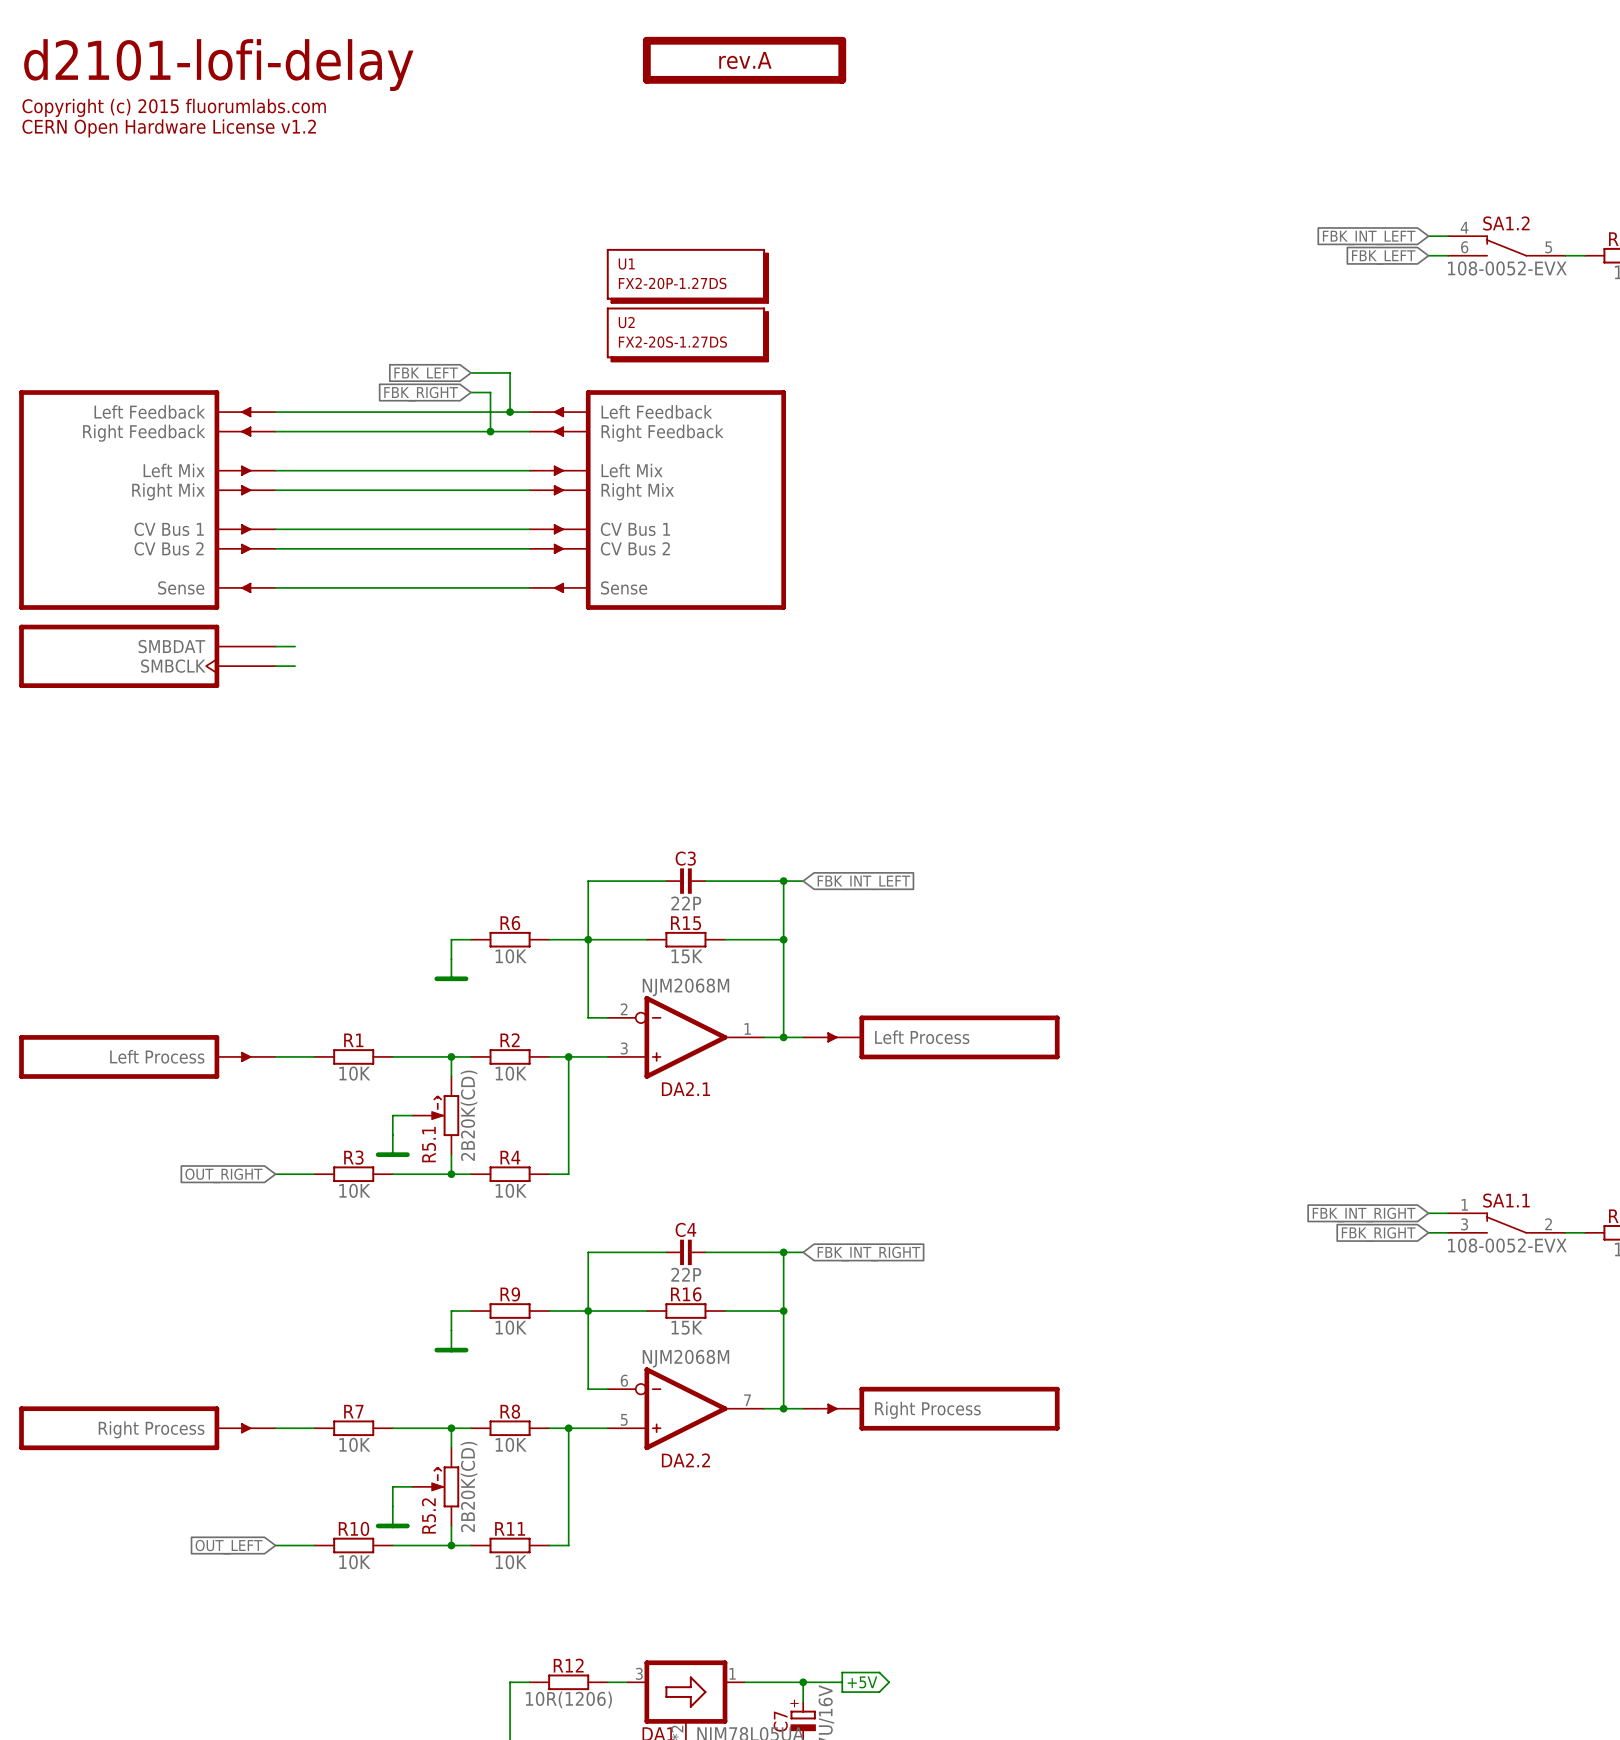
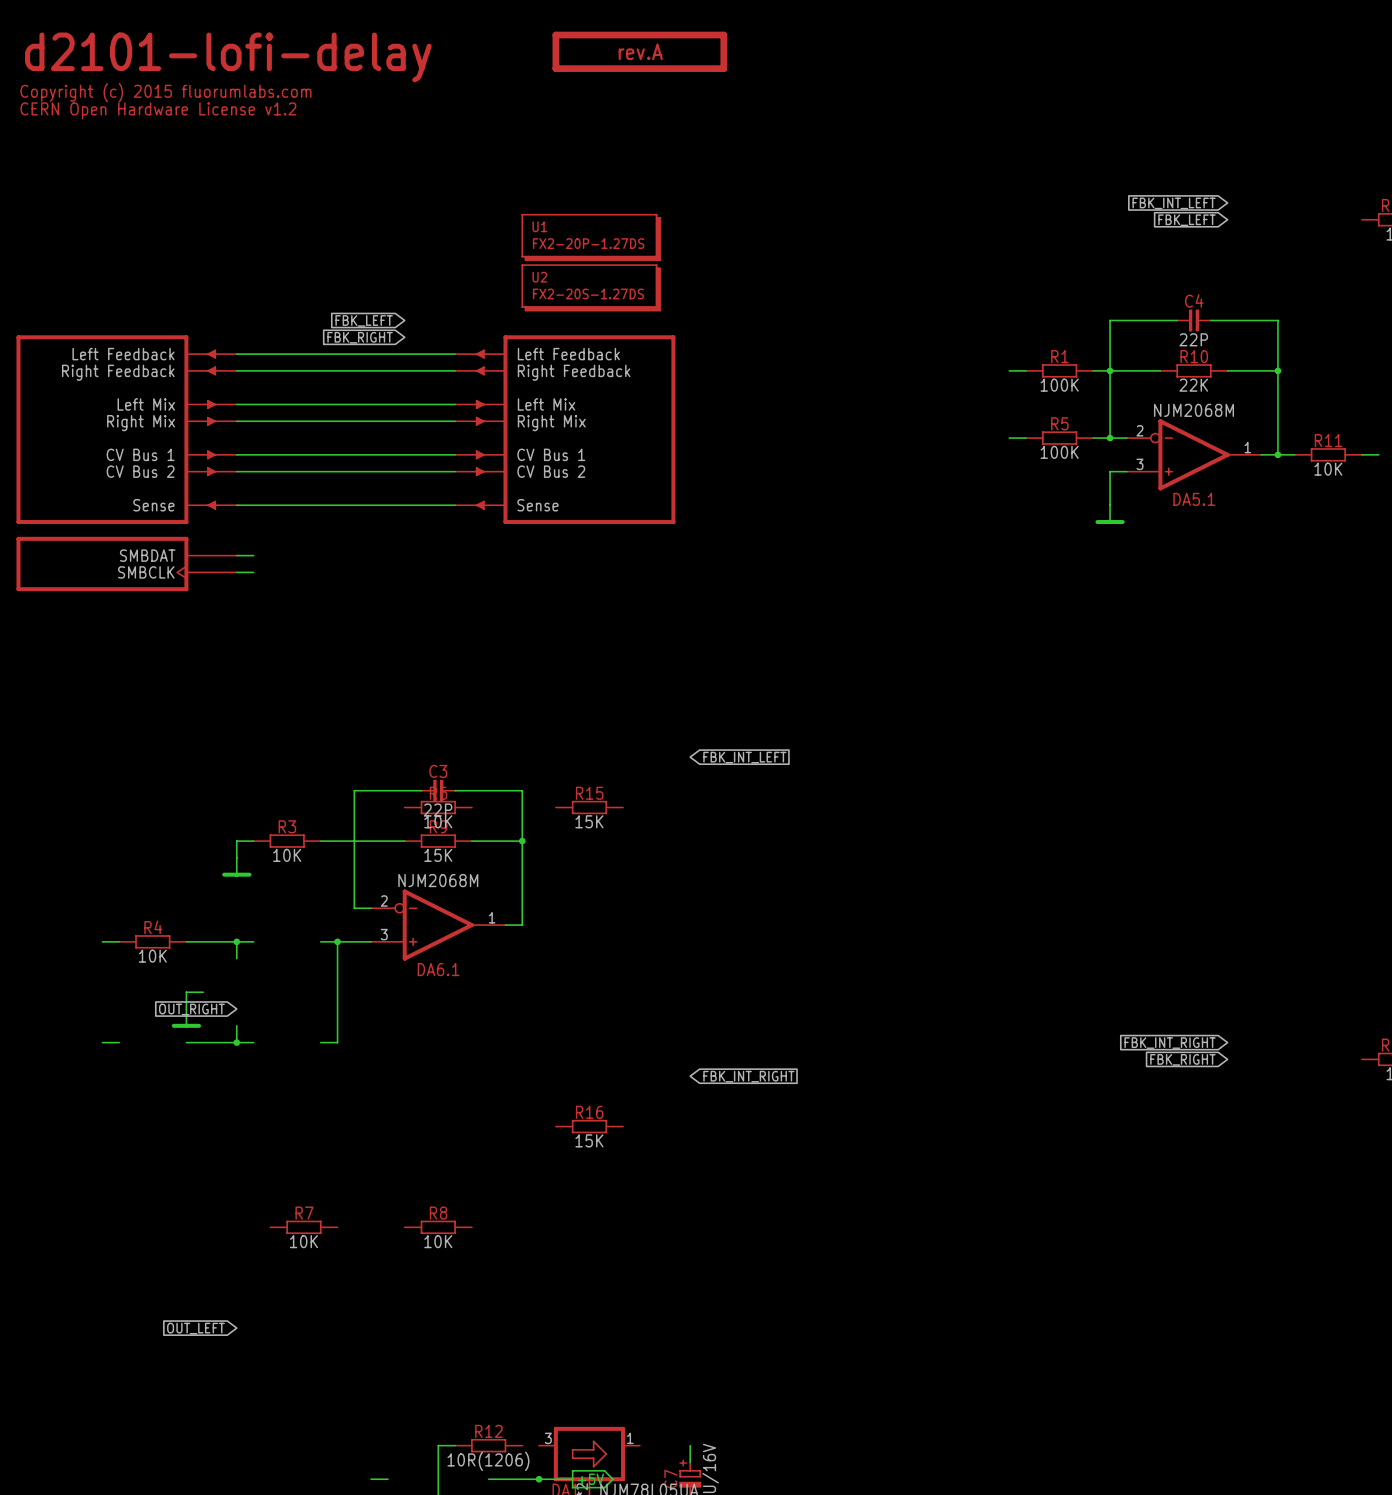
wire: (1428, 236) (1448, 236) -> none
SA1.2: 108-0052-EVX (1506, 245) -> none
wire: (1428, 255) (1448, 255) -> none
wire: (1565, 255) (1584, 255) -> none
wire: (470, 372) (510, 372) (510, 412) -> none
wire: none -> (1177, 320) (1110, 320) (1110, 438)
wire: none -> (1210, 320) (1277, 320) (1277, 454)
wire: (470, 392) (490, 392) (490, 431) -> none
junction: (510, 412) -> none
junction: (490, 431) -> none
wire: none -> (1009, 370) (1026, 370)
wire: none -> (1093, 370) (1160, 370)
junction: none -> (1110, 370)
wire: none -> (1227, 370) (1277, 370)
junction: none -> (1277, 370)
wire: none -> (1009, 438) (1026, 438)
R5: none -> 100K (1059, 438)
wire: none -> (1093, 438) (1126, 438)
junction: none -> (1110, 438)
DA5.1: none -> NJM2068M (1193, 454)
wire: none -> (1261, 454) (1294, 454)
junction: none -> (1277, 454)
wire: none -> (1361, 454) (1378, 454)
wire: none -> (1126, 471) (1110, 471) (1110, 505)
power symbol: none -> (1110, 514)
wire: (666, 881) (588, 881) (588, 1017) (607, 1017) -> none
C3 position: (685, 881) -> (438, 790)
wire: (705, 881) (803, 881) -> none
wire: (783, 881) (783, 1037) -> none
junction: (783, 881) -> none
wire: none -> (455, 790) (522, 790) (522, 925) (505, 925)
wire: (470, 939) (451, 939) (451, 959) -> (253, 841) (236, 841) (236, 857)
wire: (549, 939) (646, 939) -> (320, 841) (404, 841)
junction: (588, 939) -> none
wire: (725, 939) (783, 939) -> (471, 841) (522, 841)
junction: (783, 939) -> none
power symbol: (451, 969) -> none
junction: none -> (522, 841)
power symbol: none -> (236, 867)
DA2.1: NJM2068M (685, 1037) -> none
wire: (764, 1037) (803, 1037) -> none
junction: (783, 1037) -> none
part: (931, 1037) -> none
part: (147, 1056) -> none
wire: (275, 1056) (314, 1056) -> none
R1 position: (353, 1056) -> (1059, 370)
wire: (392, 1056) (412, 1056) -> (421, 790) (354, 790) (354, 908)
wire: (451, 1056) (451, 1076) -> (236, 941) (236, 958)
junction: (451, 1056) -> none
R2: 10K (510, 1056) -> none
wire: (549, 1056) (607, 1056) -> (320, 941) (371, 941)
wire: (568, 1056) (568, 1174) (549, 1174) -> none
junction: (568, 1056) -> none
R1 value: 10K (354, 1073) -> 100K (1059, 385)
DA6.1: none -> NJM2068M (438, 925)
wire: none -> (102, 941) (119, 941)
wire: none -> (186, 941) (253, 941)
junction: none -> (236, 941)
junction: none -> (337, 941)
wire: (392, 1115) (412, 1115) -> (337, 958) (337, 941)
R5.1: 2B20K(CD) (435, 1115) -> none
wire: none -> (337, 975) (337, 1042) (320, 1042)
power symbol: (392, 1145) -> none
wire: none -> (203, 992) (186, 992) (186, 1009)
wire: (451, 1154) (451, 1174) -> (236, 1025) (236, 1042)
wire: (275, 1174) (314, 1174) -> none
R3 position: (353, 1174) -> (287, 841)
wire: (392, 1174) (470, 1174) -> (186, 1042) (253, 1042)
junction: (451, 1174) -> none
R4 position: (510, 1174) -> (152, 941)
power symbol: none -> (186, 1018)
wire: none -> (102, 1042) (119, 1042)
junction: none -> (236, 1042)
wire: (1428, 1213) (1448, 1213) -> none
SA1.1: 108-0052-EVX (1506, 1223) -> none
wire: (1428, 1232) (1448, 1232) -> none
wire: (1565, 1232) (1584, 1232) -> none
wire: (666, 1252) (588, 1252) (588, 1389) (607, 1389) -> none
C4 position: (685, 1252) -> (1193, 320)
wire: (705, 1252) (803, 1252) -> none
wire: (783, 1252) (783, 1408) -> none
junction: (783, 1252) -> none
wire: (470, 1311) (451, 1311) (451, 1330) -> none
R9 position: (510, 1311) -> (438, 841)
wire: (549, 1311) (646, 1311) -> none
junction: (588, 1311) -> none
wire: (725, 1311) (783, 1311) -> none
junction: (783, 1311) -> none
R9 value: 10K (511, 1327) -> 15K (438, 855)
power symbol: (451, 1341) -> none
DA2.2: NJM2068M (685, 1408) -> none
wire: (764, 1408) (803, 1408) -> none
junction: (783, 1408) -> none
part: (931, 1408) -> none
part: (147, 1428) -> none
wire: (275, 1428) (314, 1428) -> none
wire: (392, 1428) (470, 1428) -> none
wire: (451, 1428) (451, 1447) -> none
junction: (451, 1428) -> none
wire: (549, 1428) (607, 1428) -> none
wire: (568, 1428) (568, 1545) (549, 1545) -> none
junction: (568, 1428) -> none
wire: (412, 1486) (392, 1486) (392, 1506) -> none
R5.2: 2B20K(CD) (435, 1486) -> none
power symbol: (392, 1517) -> none
wire: (451, 1525) (451, 1545) -> none
wire: (275, 1545) (314, 1545) -> none
R10 position: (353, 1545) -> (1193, 370)
wire: (392, 1545) (470, 1545) -> none
junction: (451, 1545) -> none
R11 position: (510, 1545) -> (1328, 454)
R10 value: 10K (354, 1562) -> 22K (1193, 385)
wire: (607, 1682) (627, 1682) -> (371, 1479) (387, 1479)
wire: (744, 1682) (842, 1682) -> (488, 1479) (572, 1479)
junction: (803, 1682) -> none
power symbol position: (865, 1682) -> (592, 1479)
junction: none -> (539, 1479)

